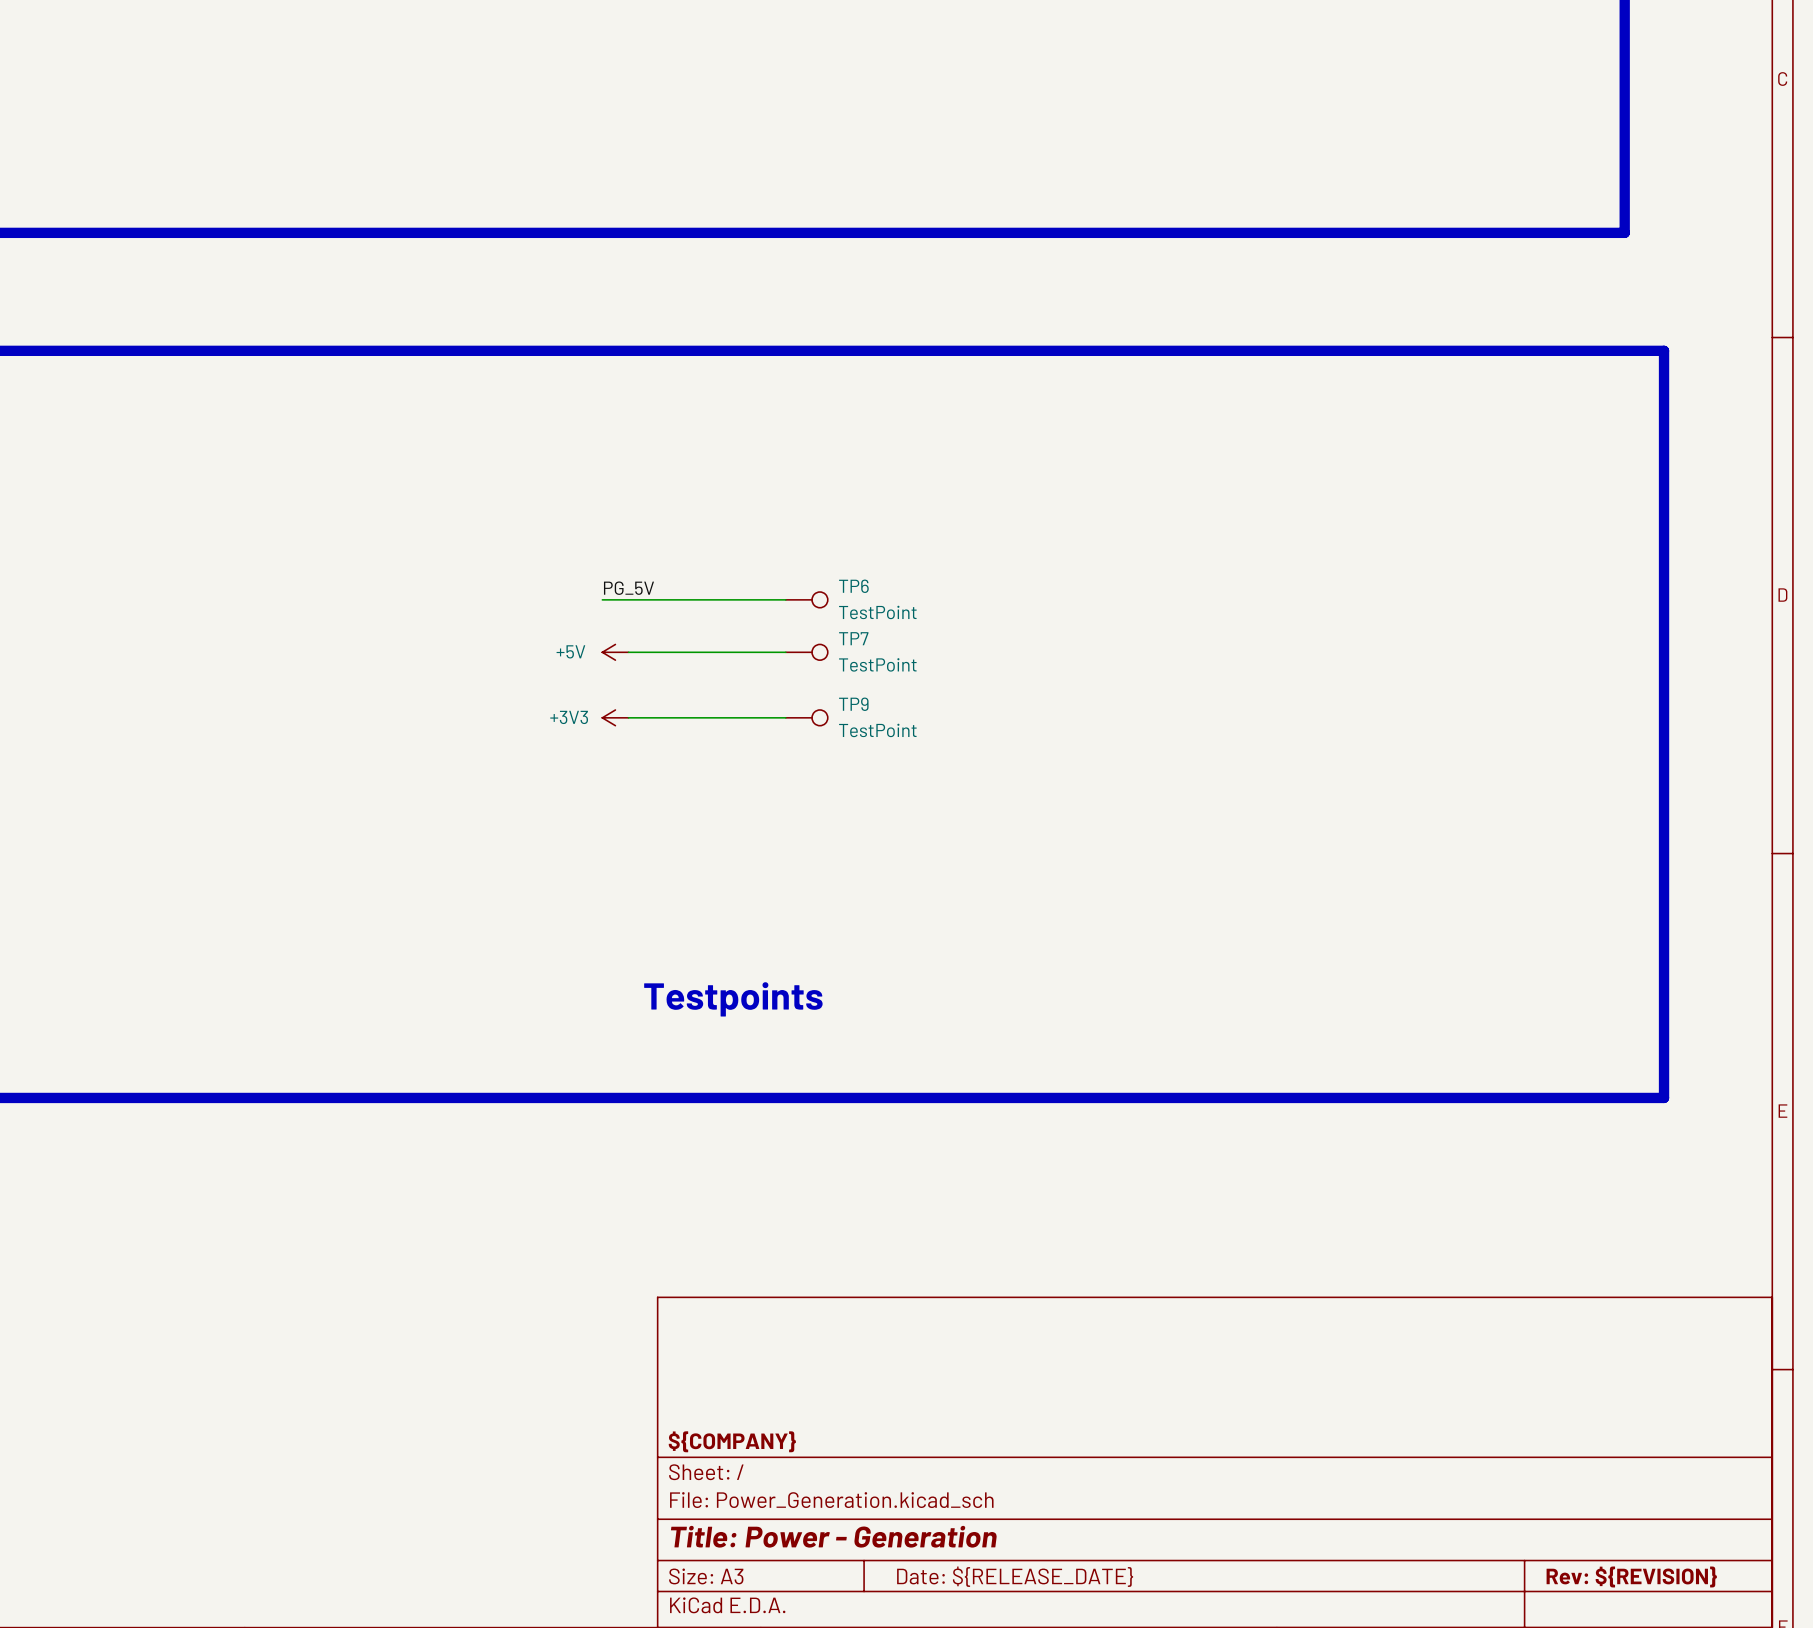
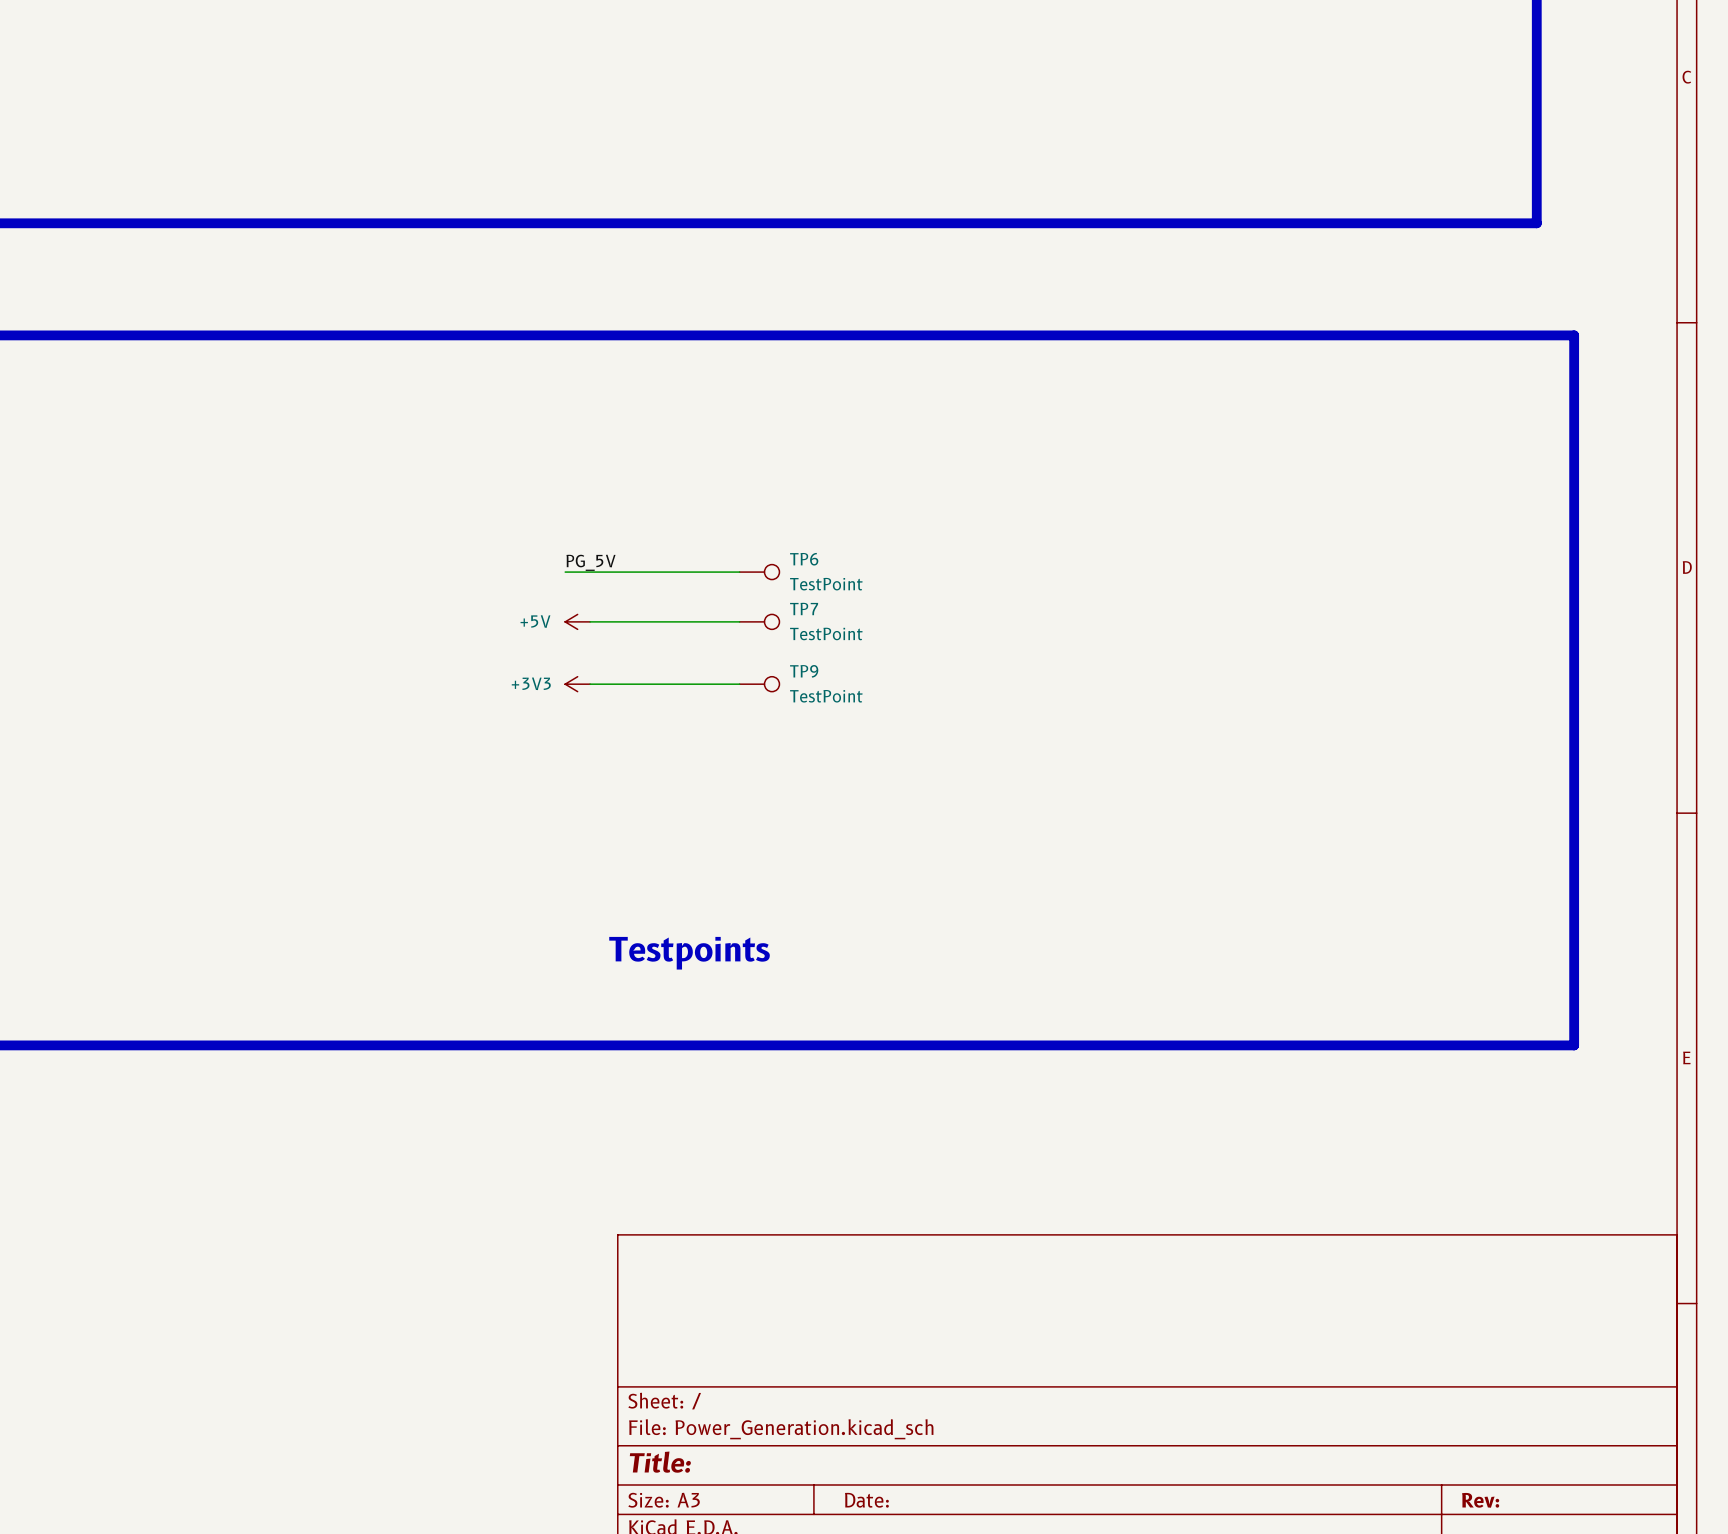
title block: ${COMPANY} (732, 1441) -> none
title block: Title: Power - Generation (833, 1536) -> Title: (660, 1462)
title block: Date: ${RELEASE_DATE} (1015, 1576) -> Date: (866, 1500)
title block: Rev: ${REVISION} (1631, 1576) -> Rev: (1480, 1500)

